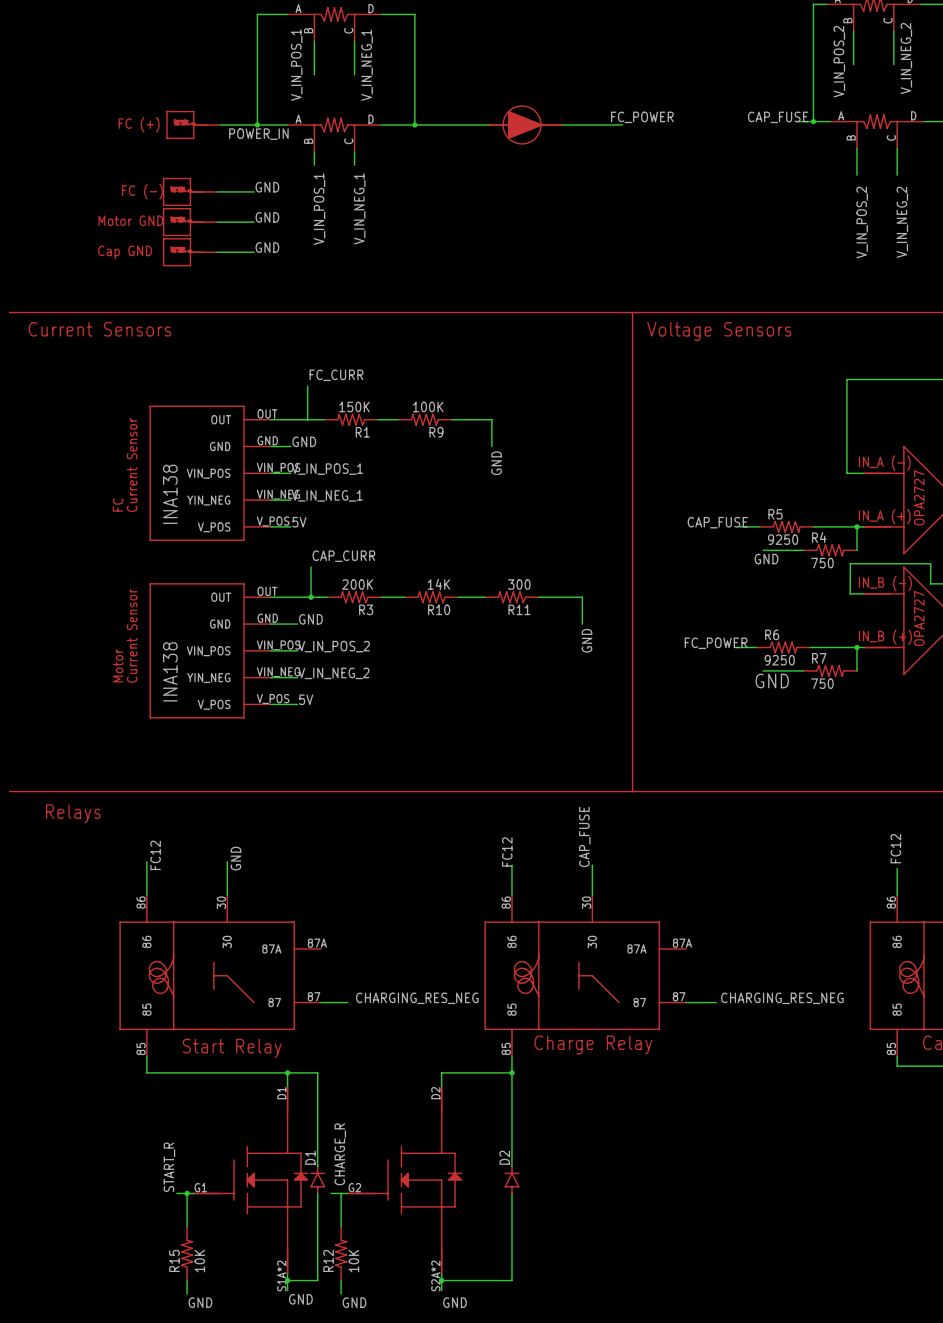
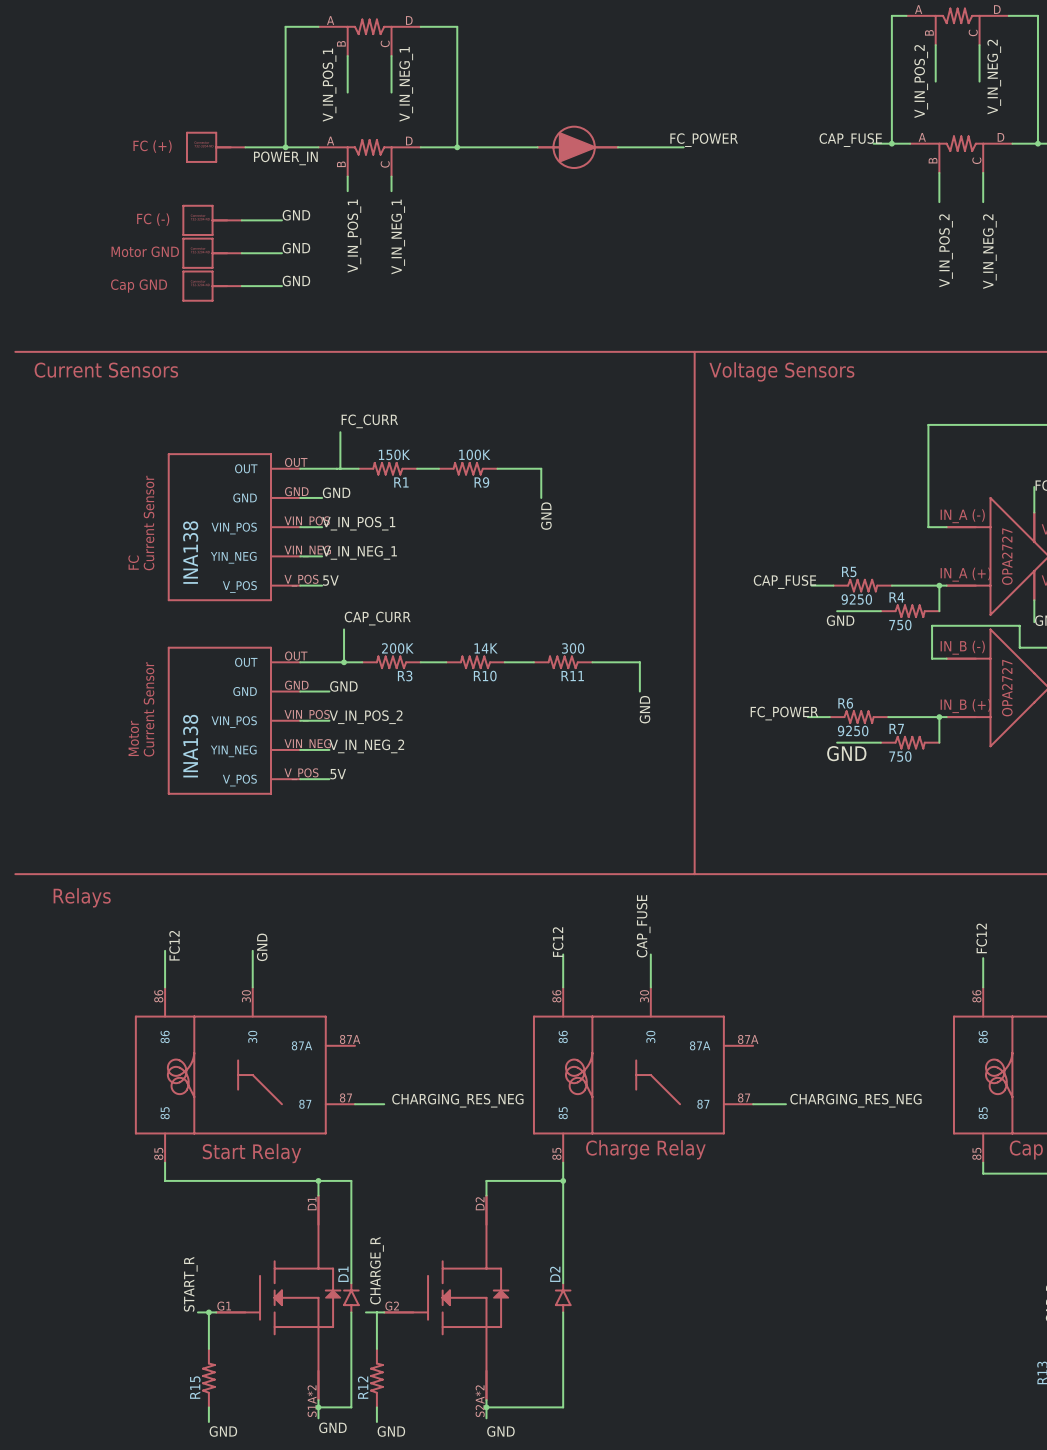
R15 value: 10K (199, 1261) -> none
R12 value: 10K (353, 1261) -> none

